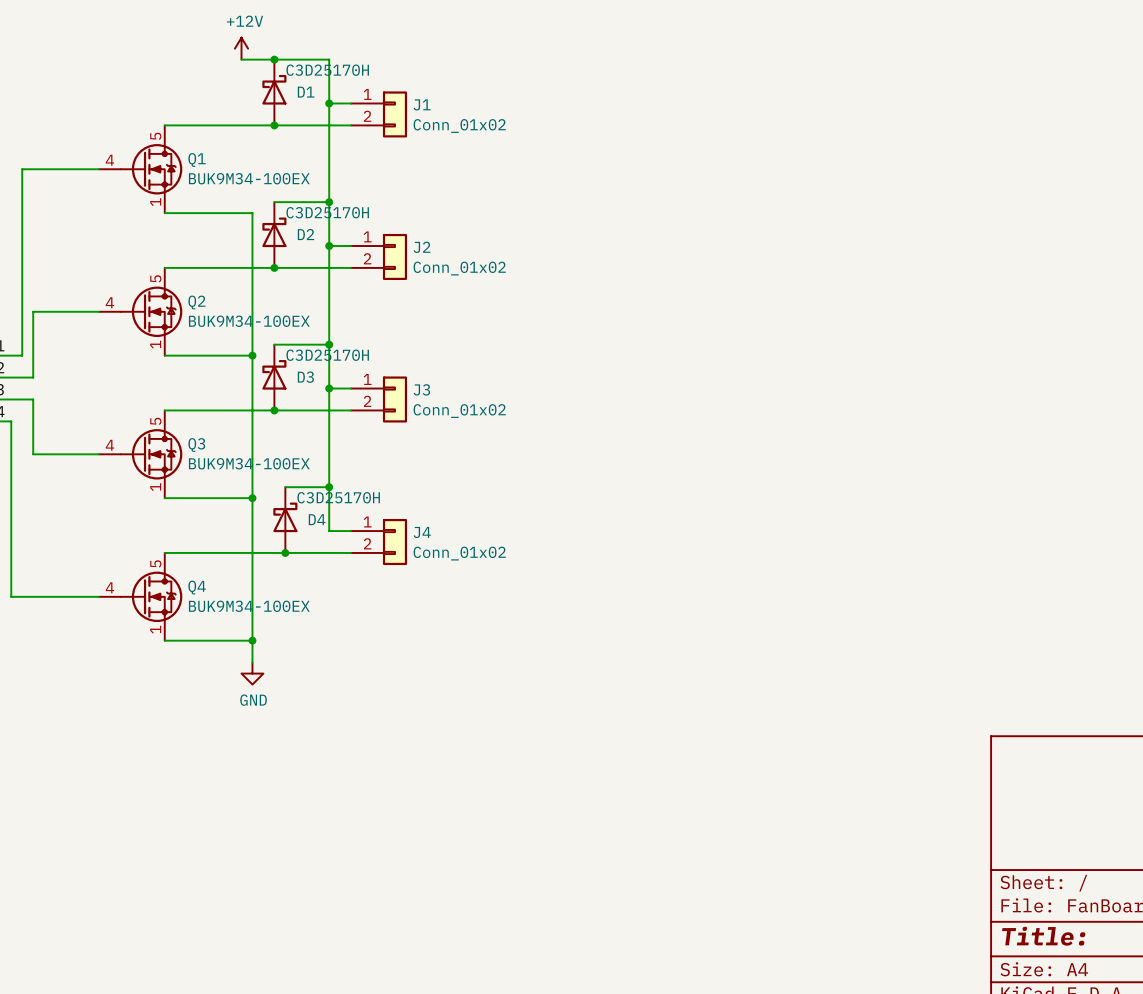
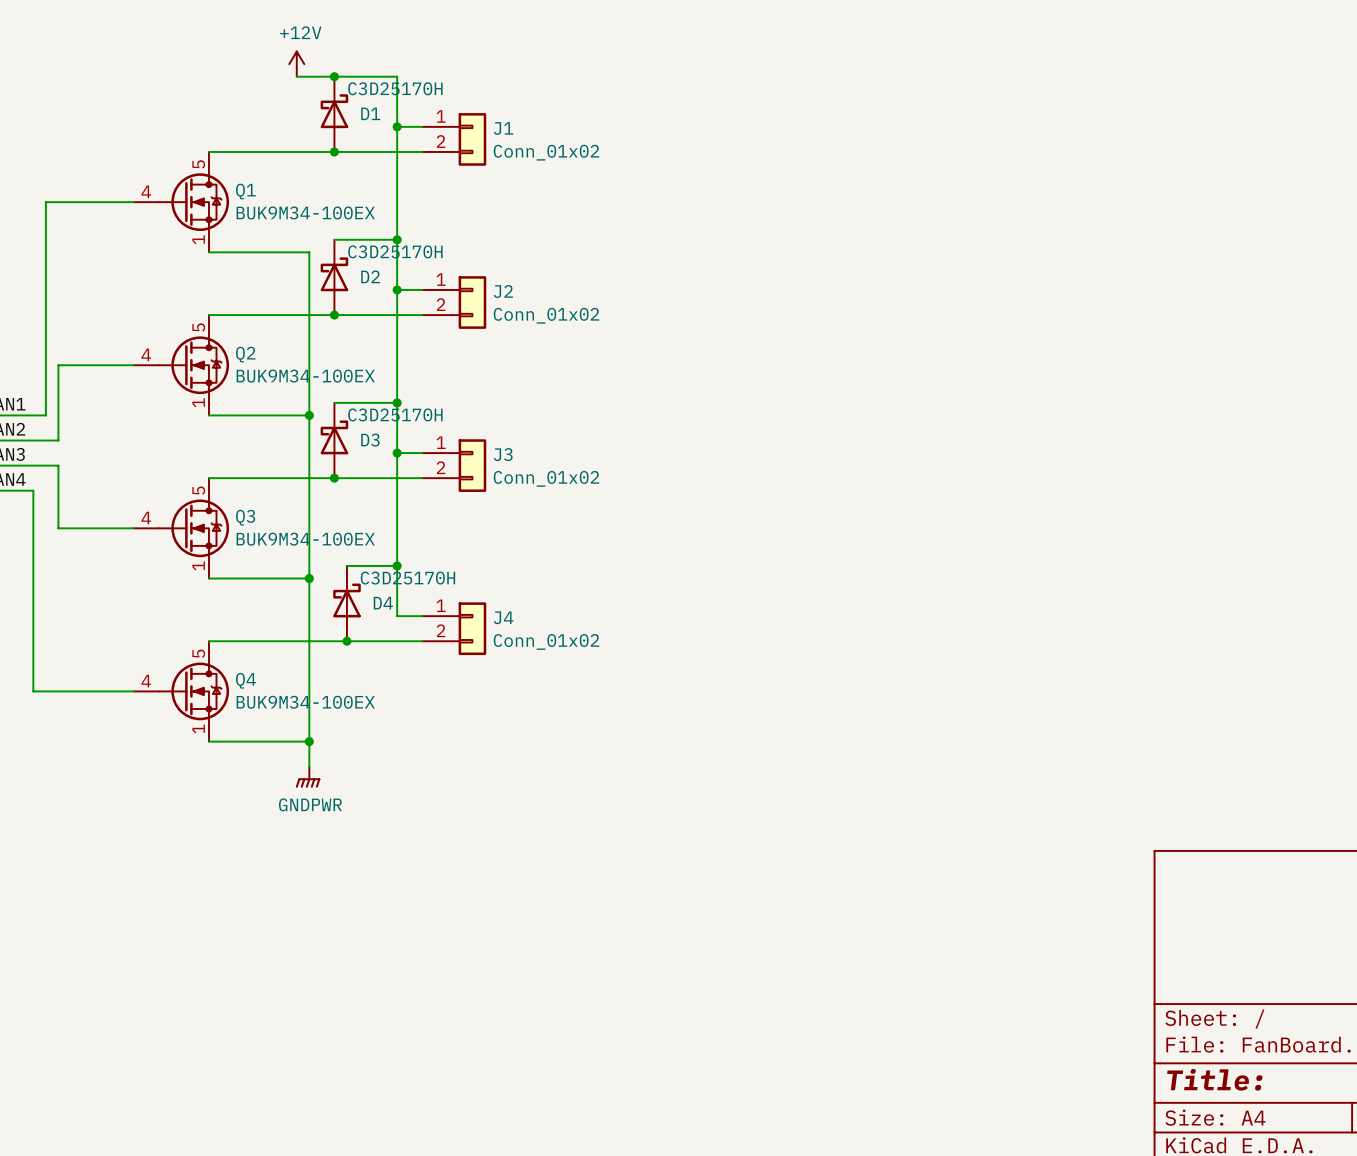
power symbol: GND (252, 673) -> GNDPWR (308, 777)

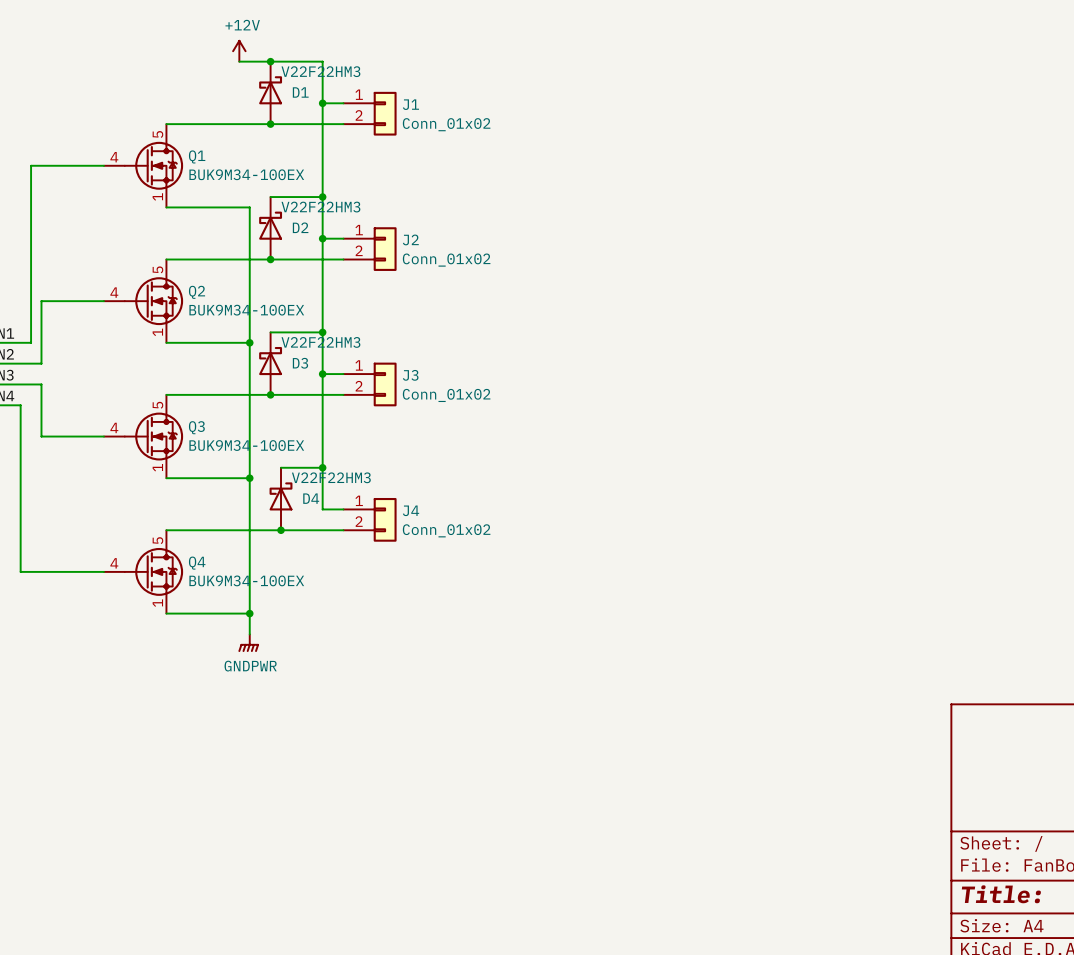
D1 value: C3D25170H (395, 88) -> V22F22HM3 (320, 71)
D2 value: C3D25170H (395, 251) -> V22F22HM3 (320, 207)
D3 value: C3D25170H (395, 414) -> V22F22HM3 (320, 342)
D4 value: C3D25170H (407, 578) -> V22F22HM3 (331, 477)

